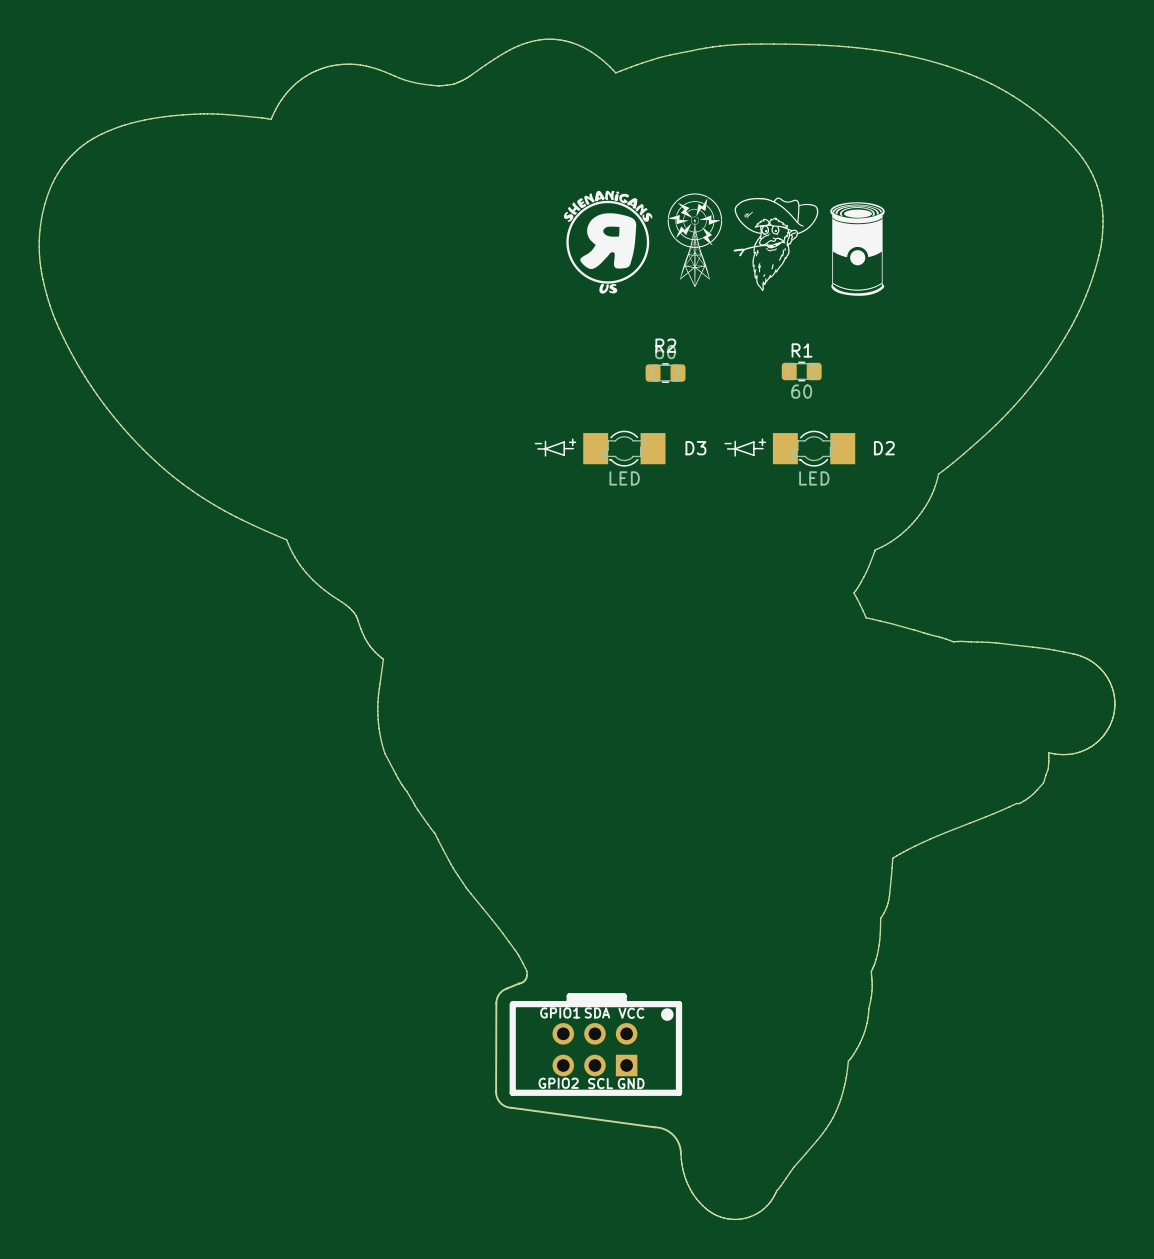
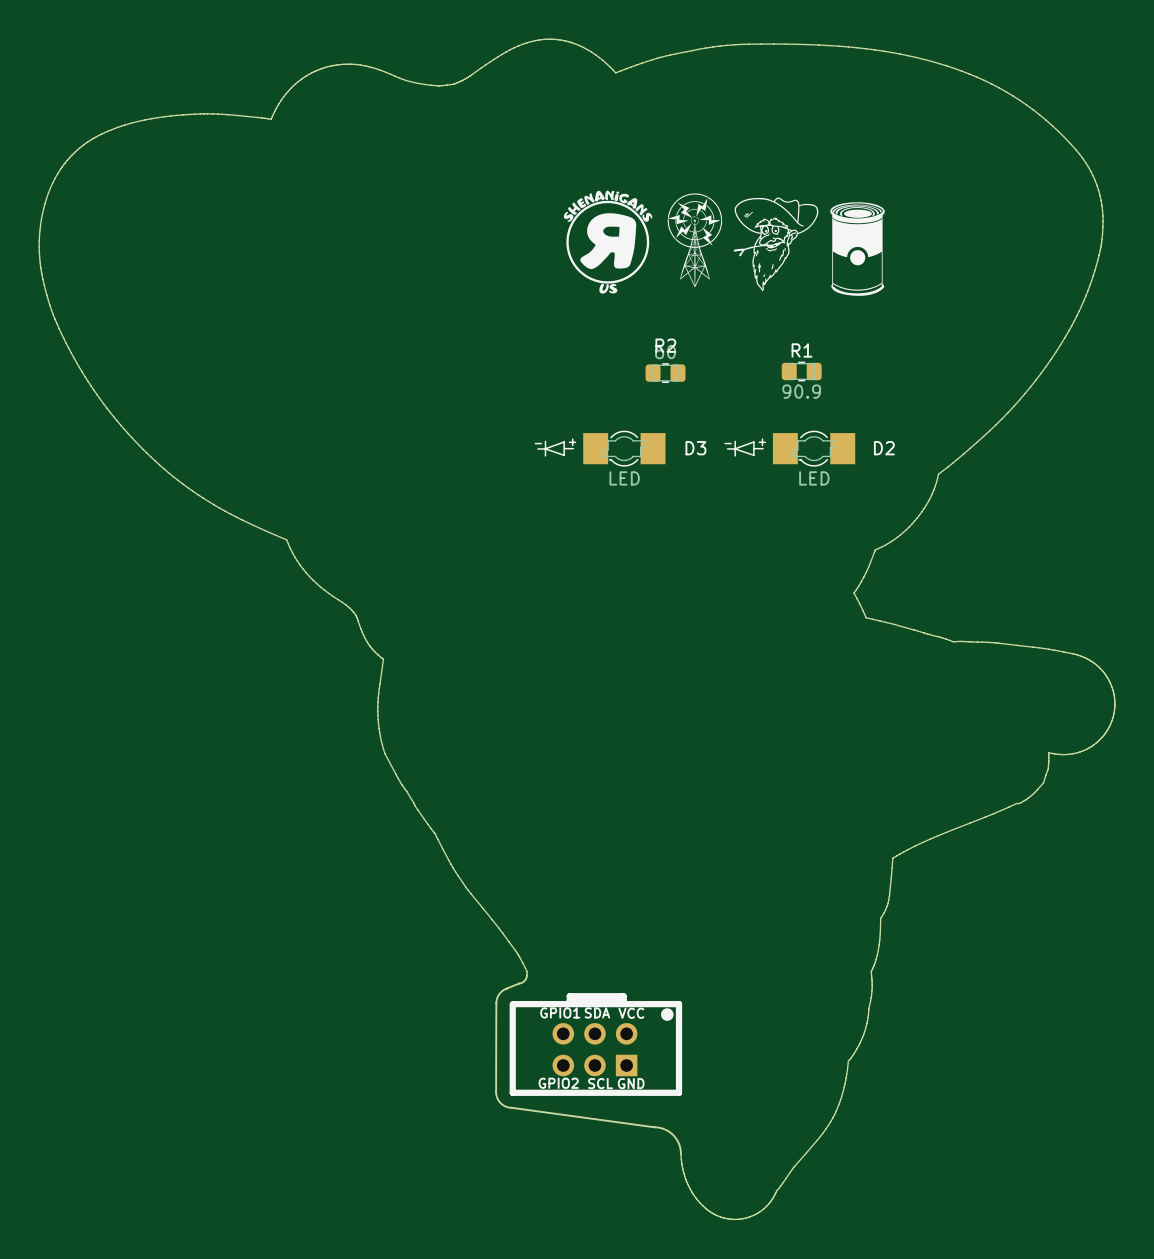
R1 value: 60 (801, 391) -> 90.9 (801, 391)

